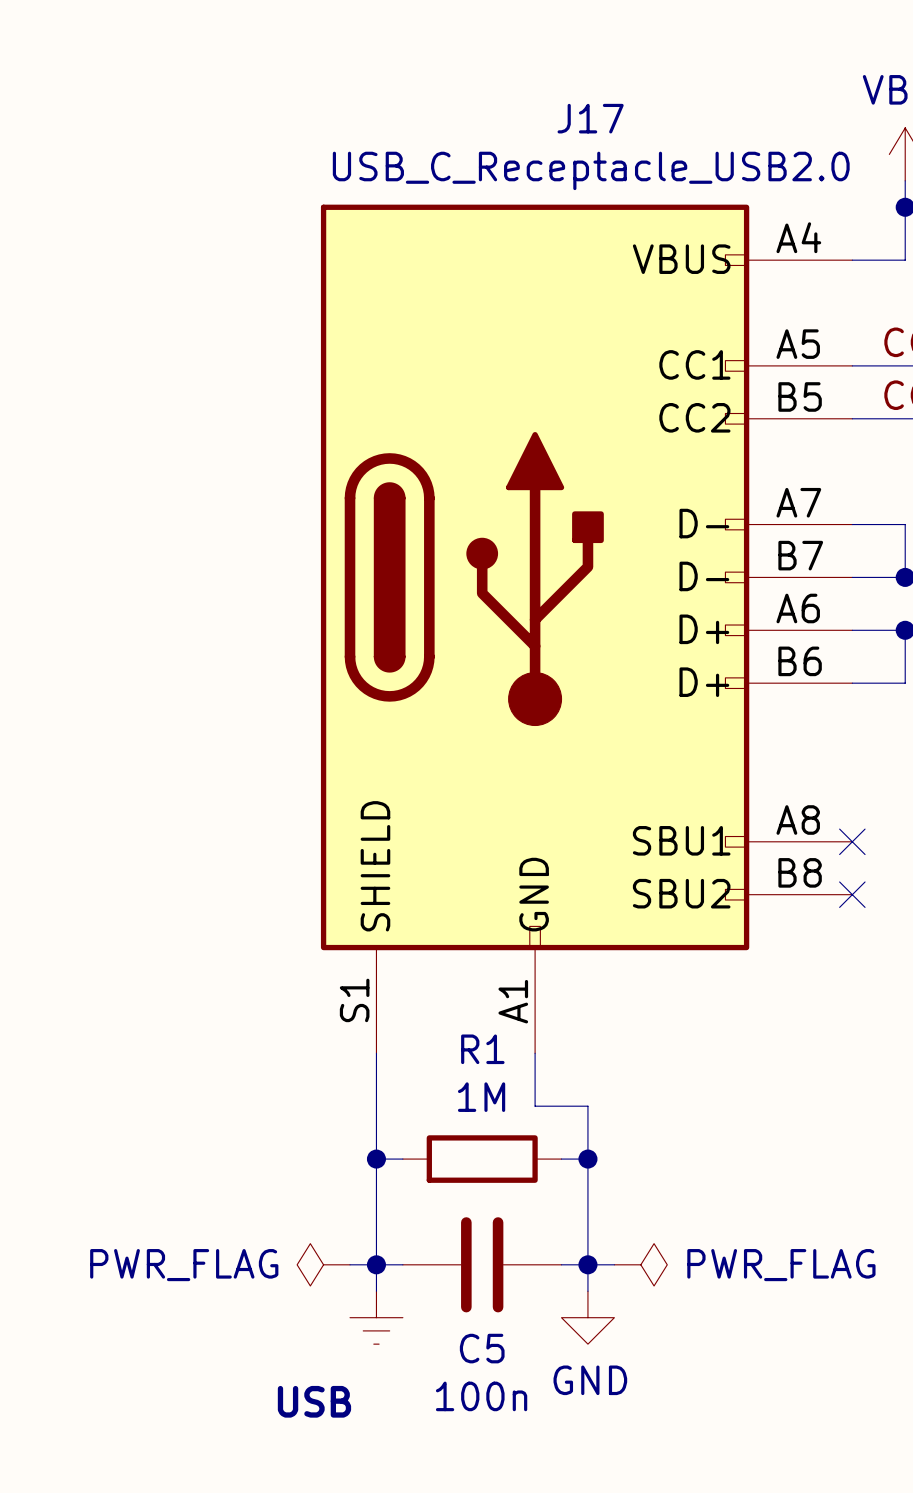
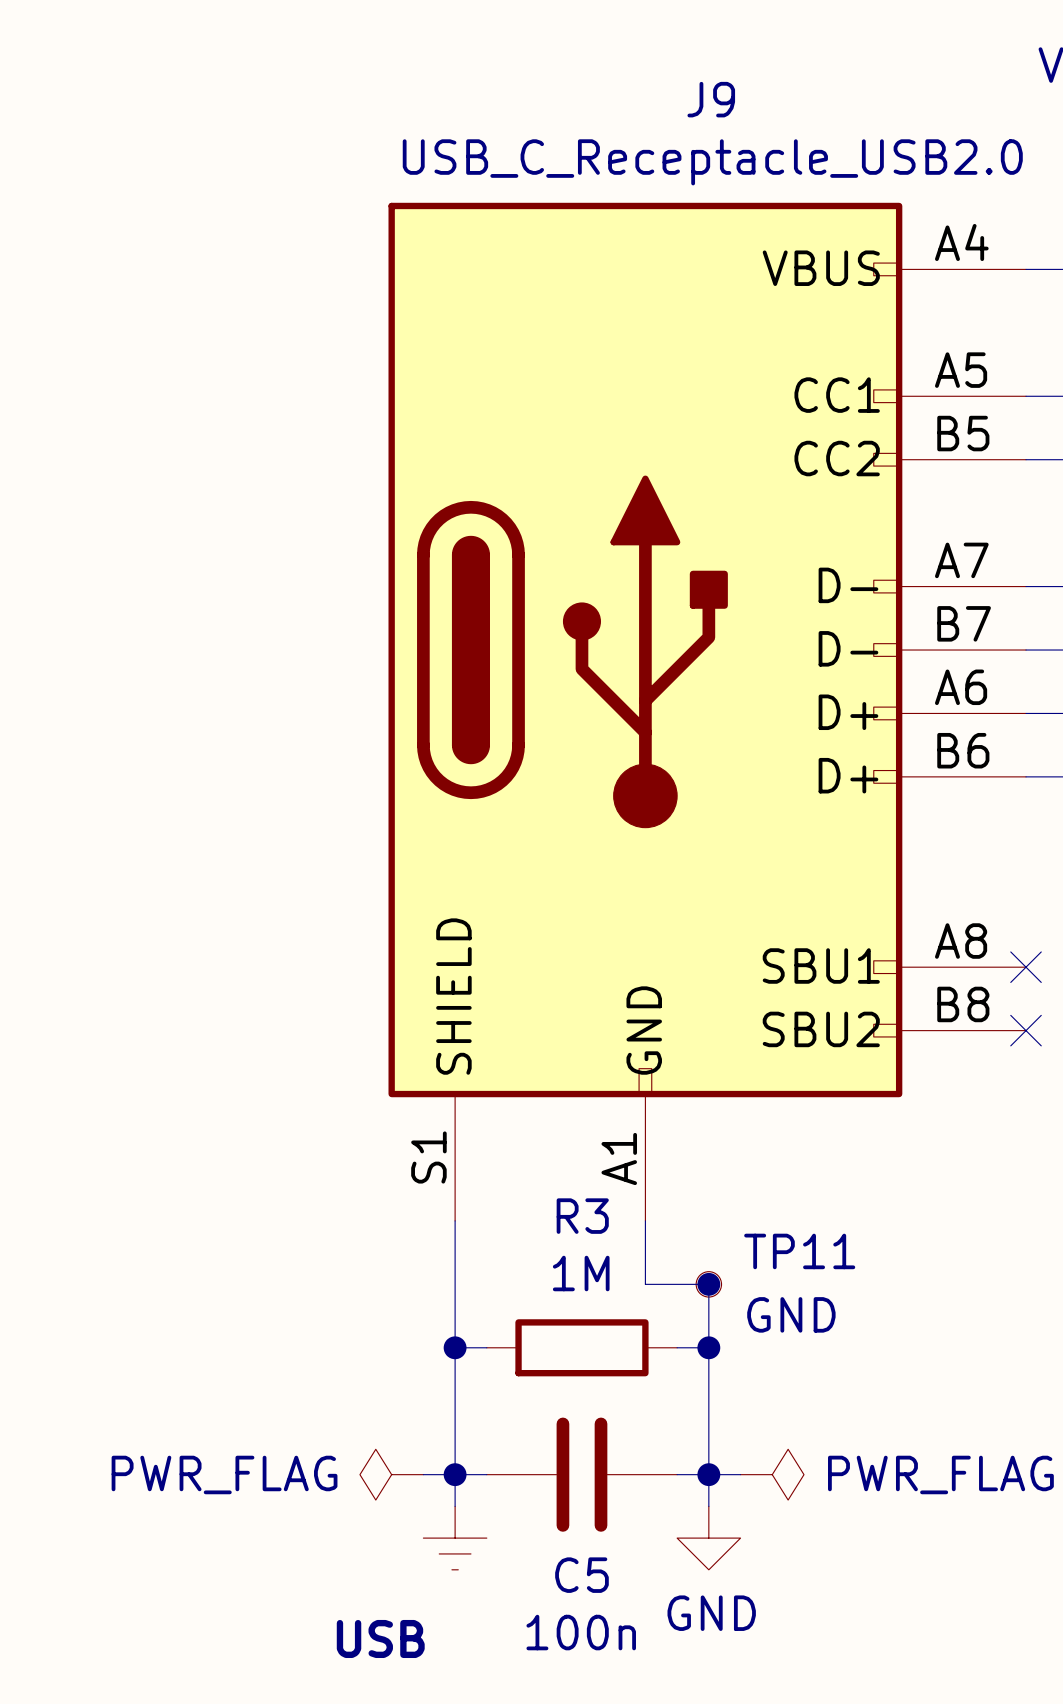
J17 name: J17 (590, 118) -> J9 (711, 99)
R1 name: R1 (482, 1049) -> R3 (582, 1216)
TP11: none -> GND (708, 1284)
junction: none -> (708, 1284)

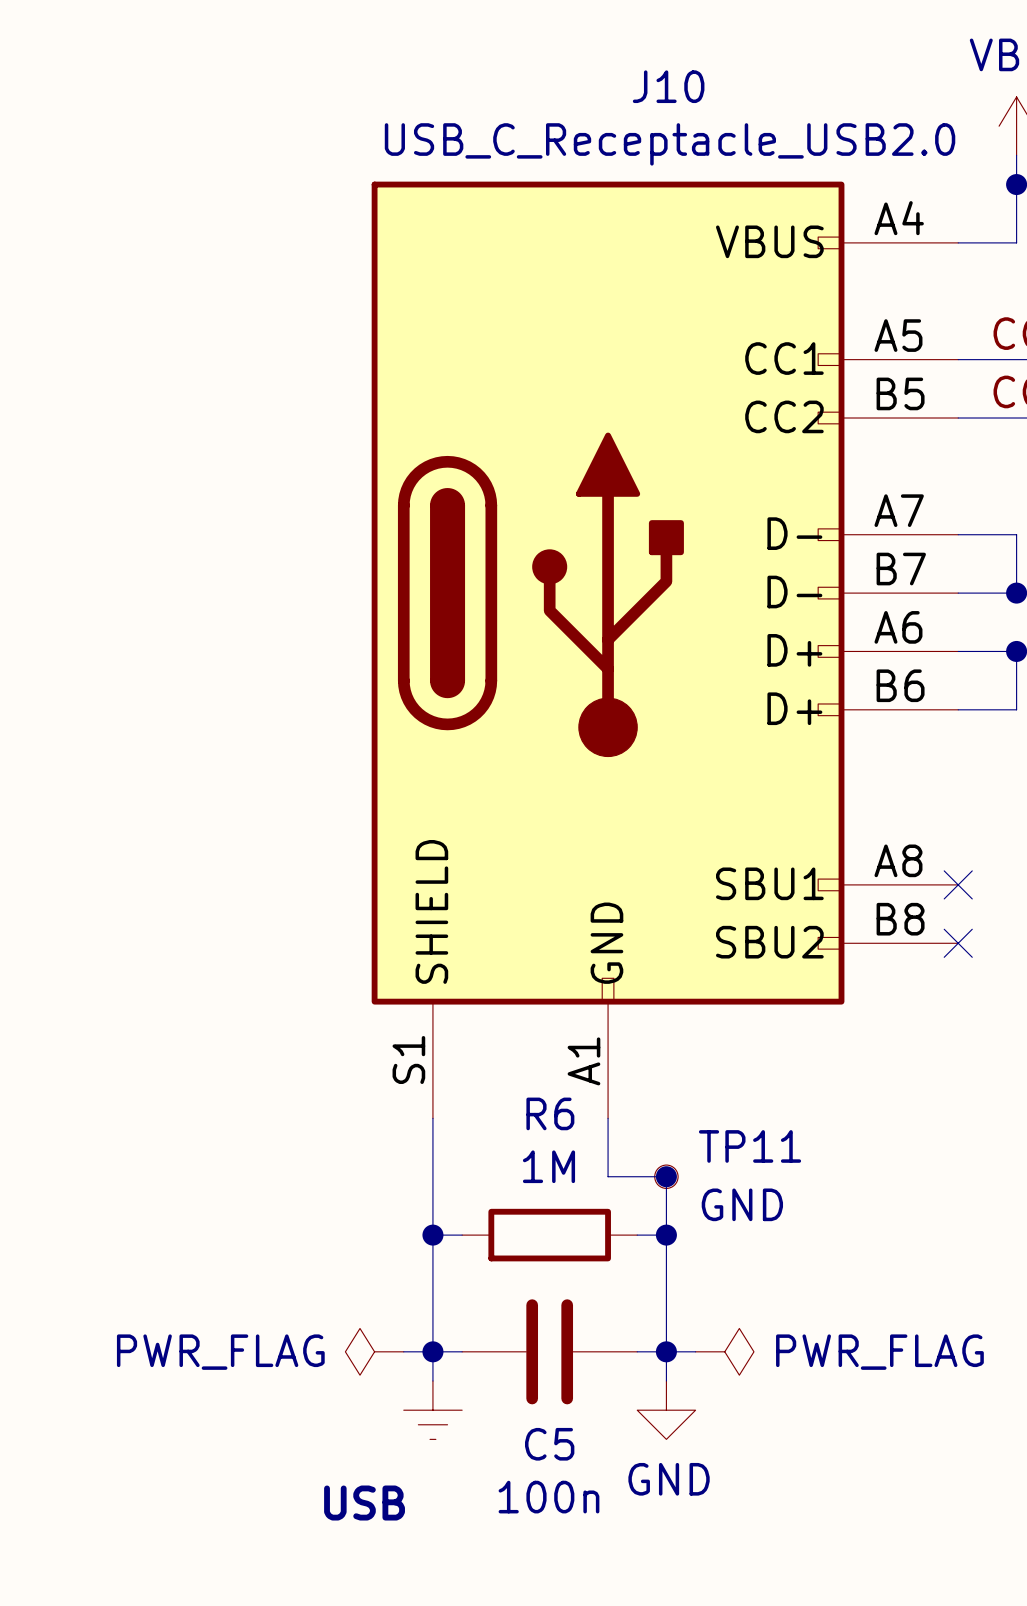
J9 name: J9 (711, 99) -> J10 (668, 86)
R3 name: R3 (582, 1216) -> R6 (550, 1113)

